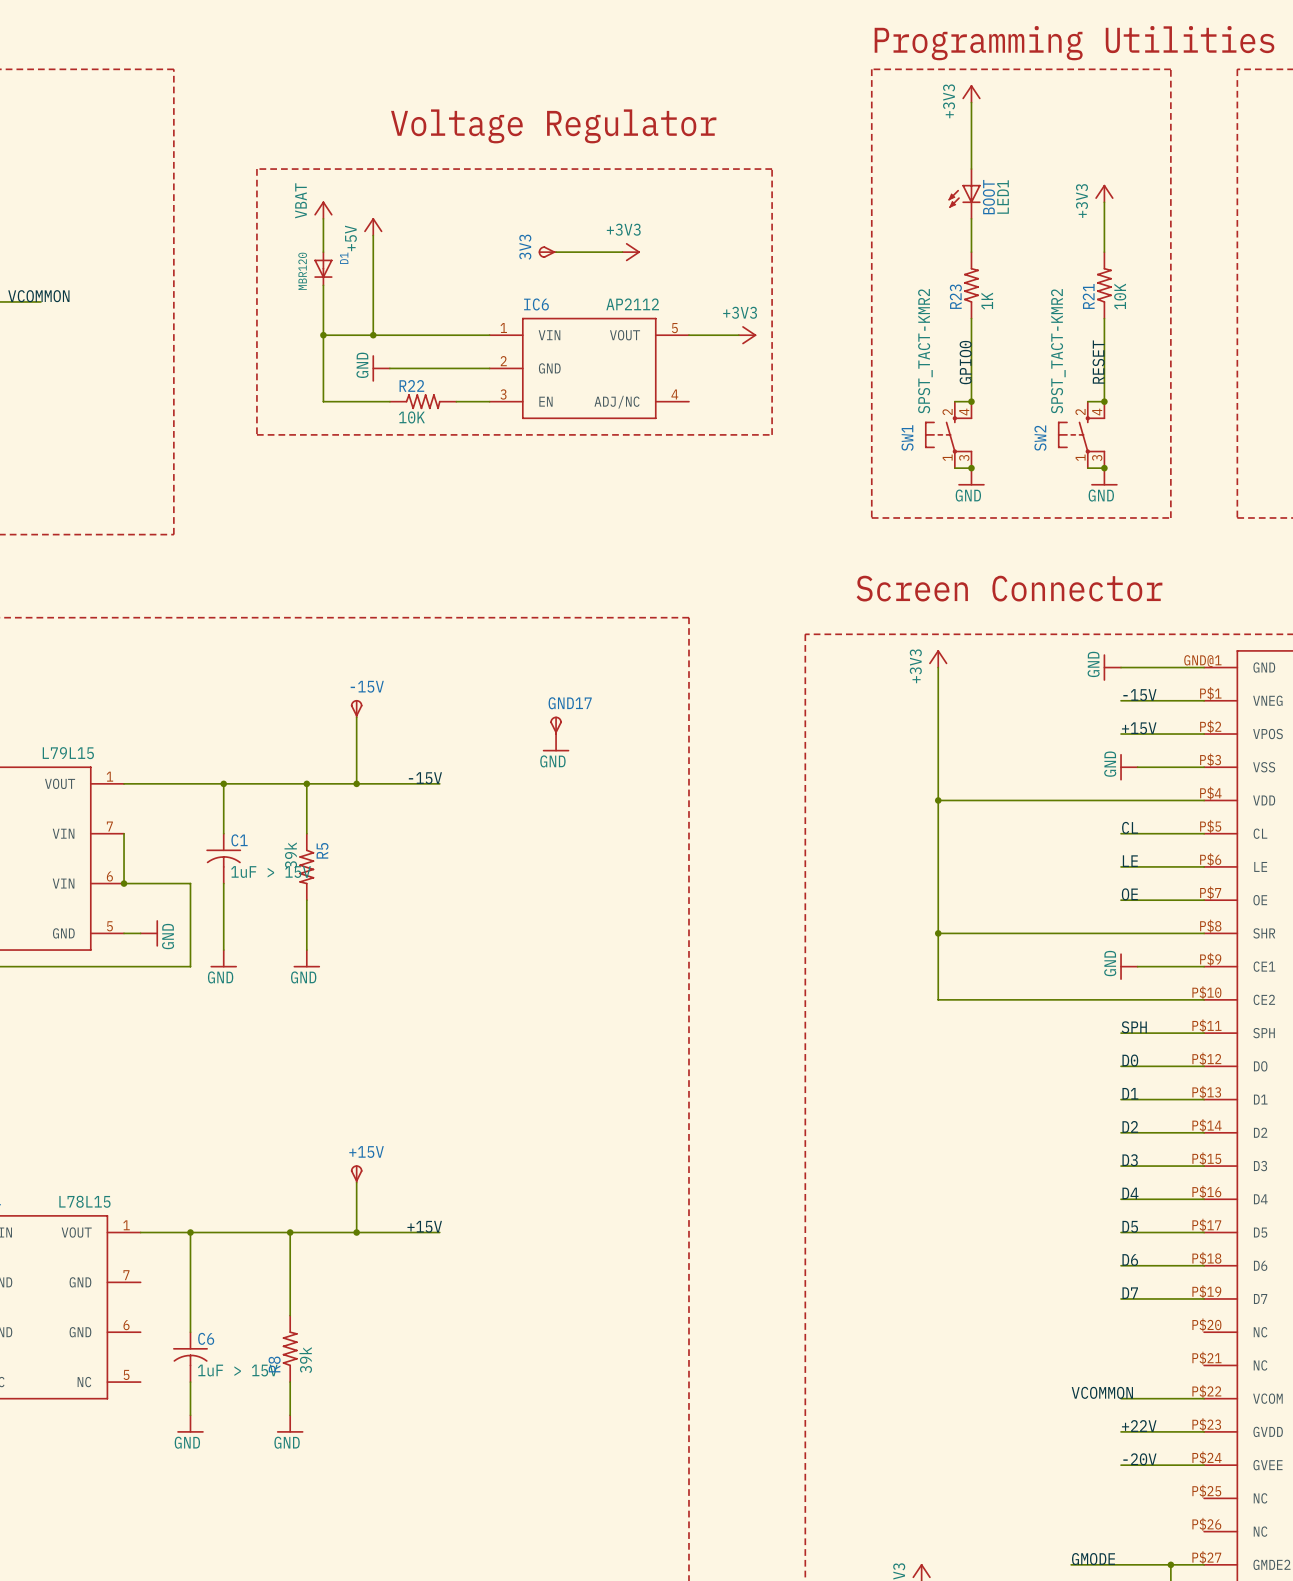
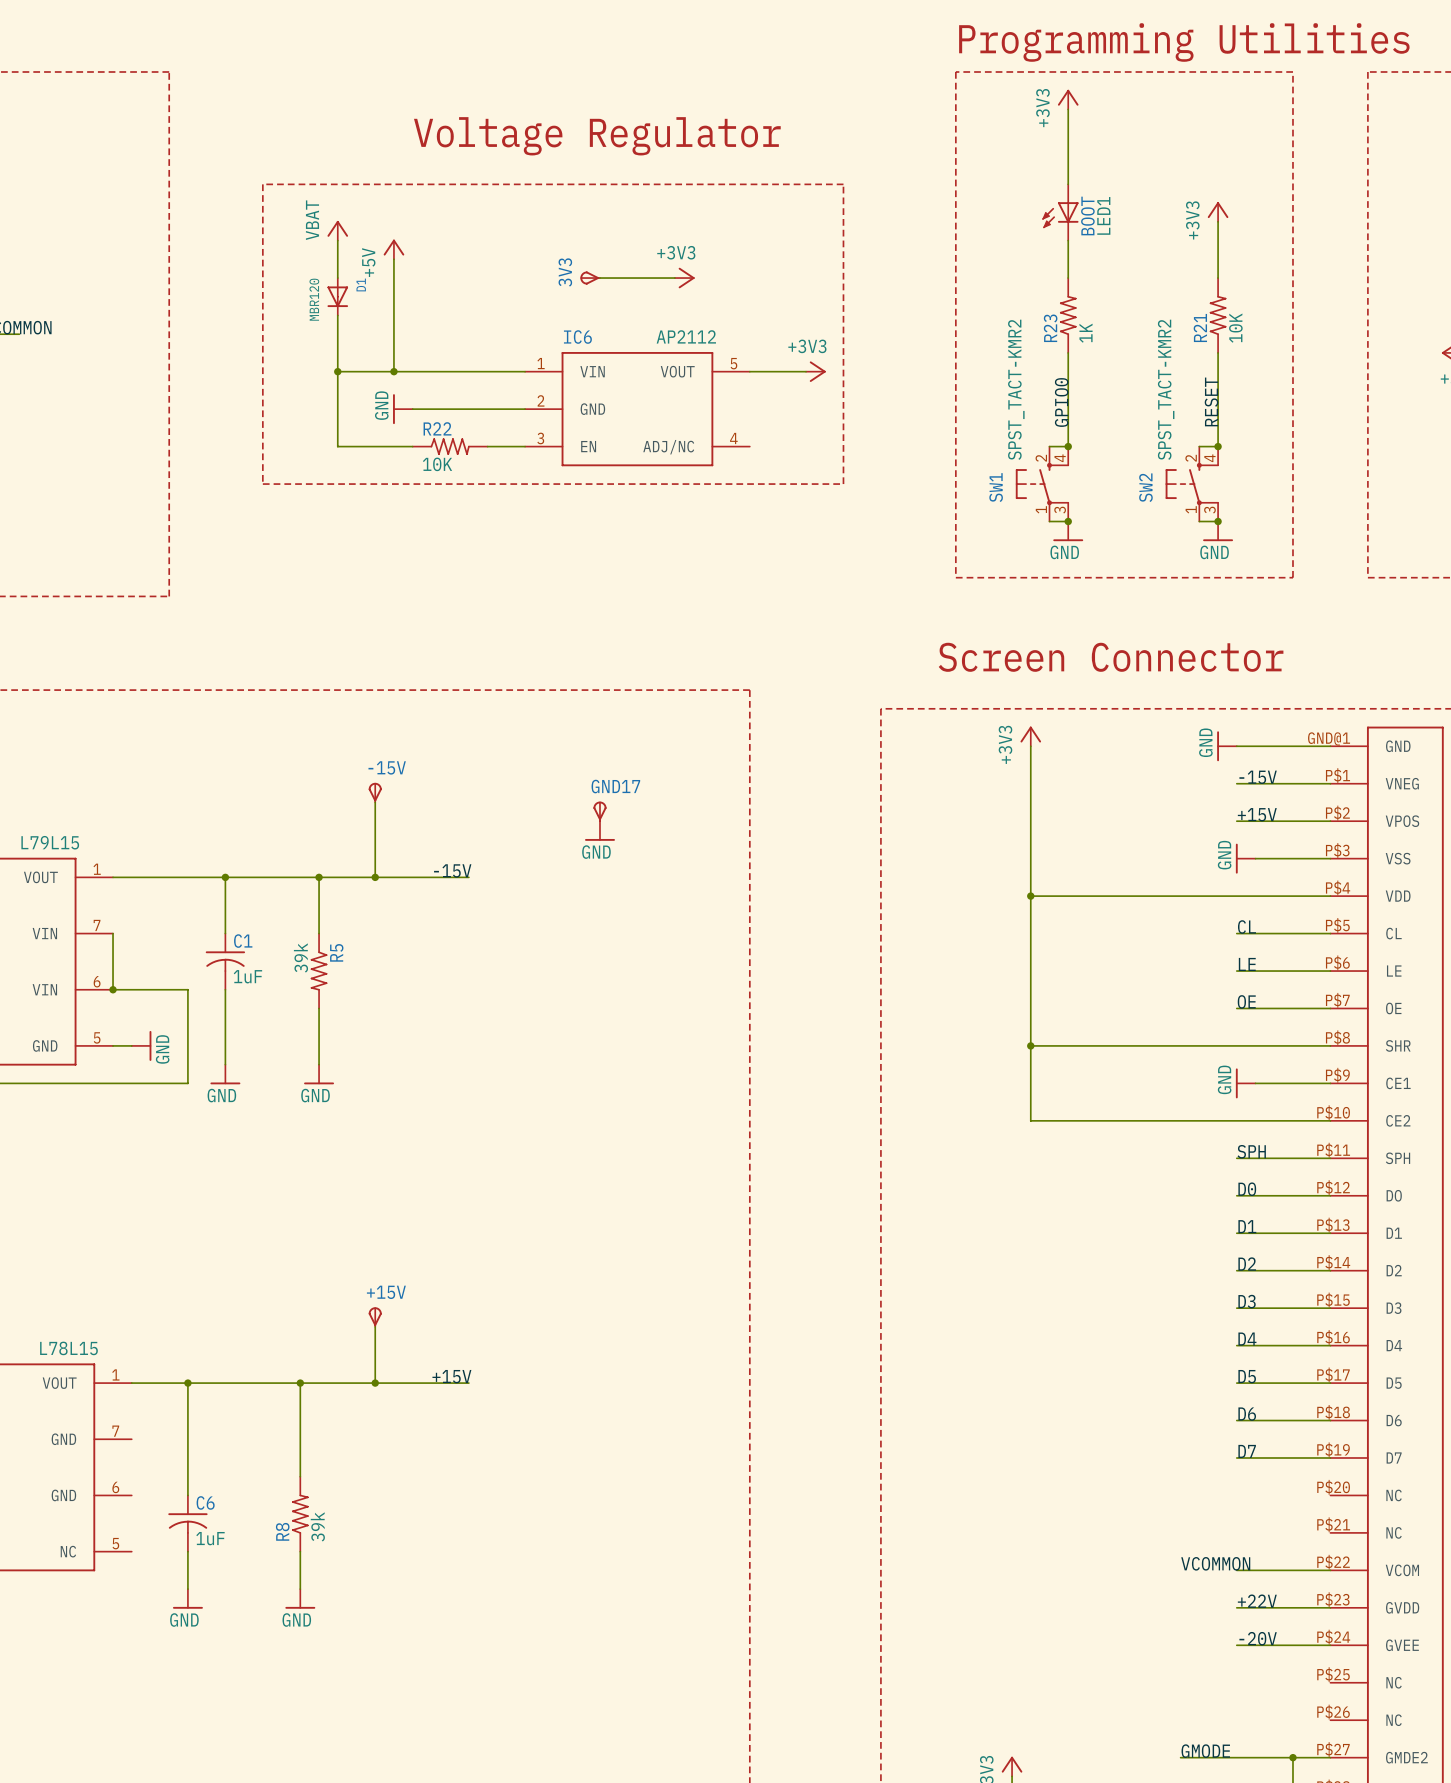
C1 value: 1uF > 15V (270, 872) -> 1uF (247, 976)
C6 value: 1uF > 15V (237, 1370) -> 1uF (210, 1538)

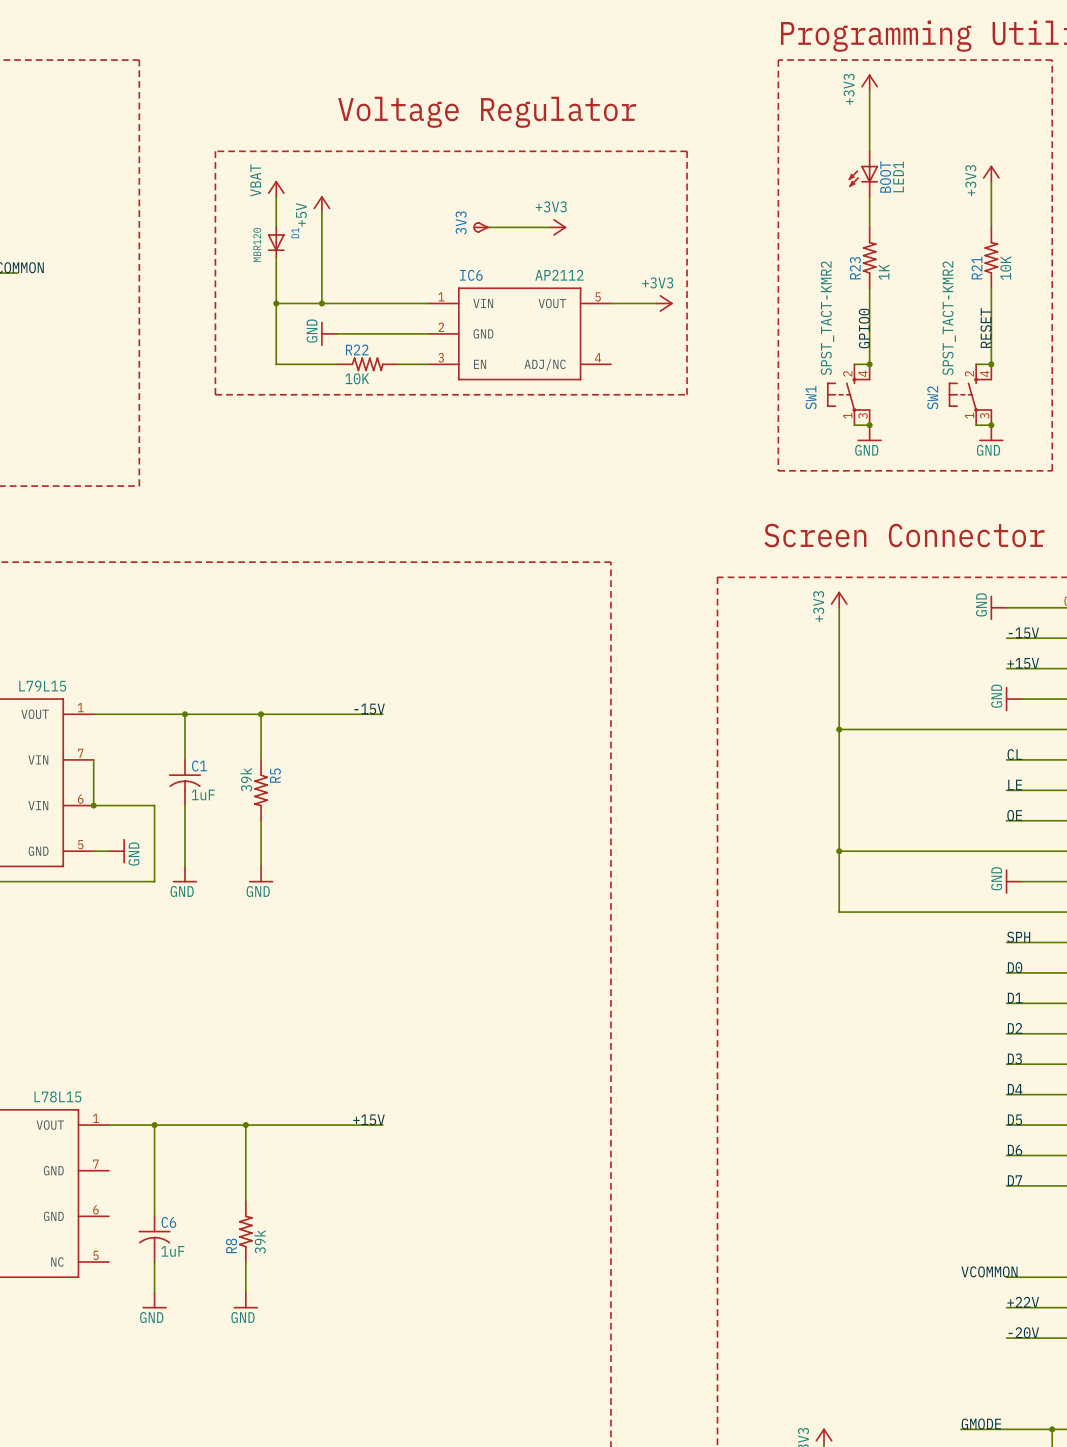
-15V: (375, 792) -> none
wire: (375, 802) (375, 877) -> none
GND17: (599, 811) -> none
power symbol: GND (599, 831) -> none
junction: (375, 877) -> none
+15V: (375, 1317) -> none
wire: (375, 1326) (375, 1383) -> none
junction: (375, 1383) -> none

